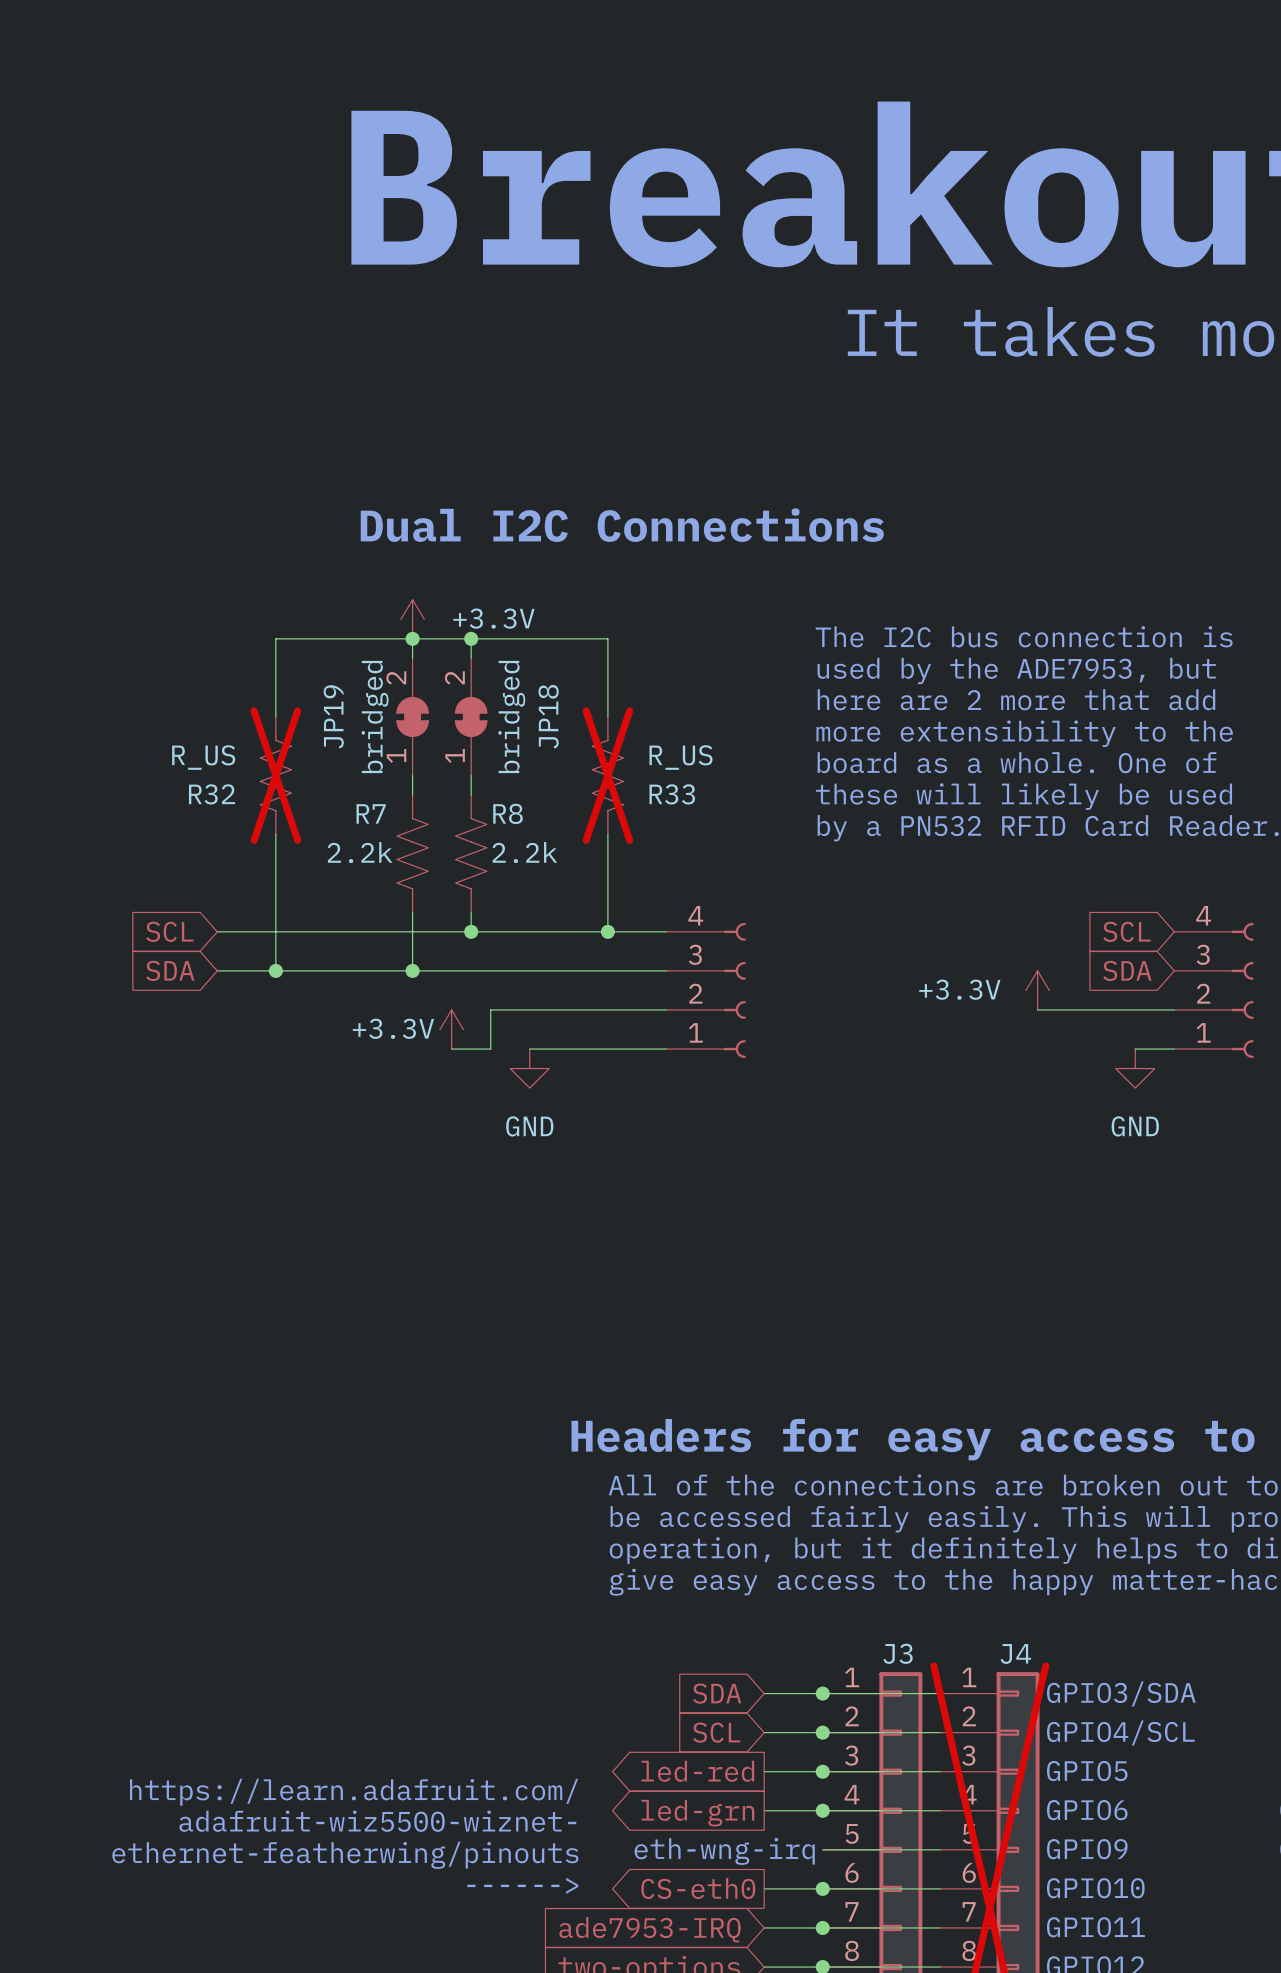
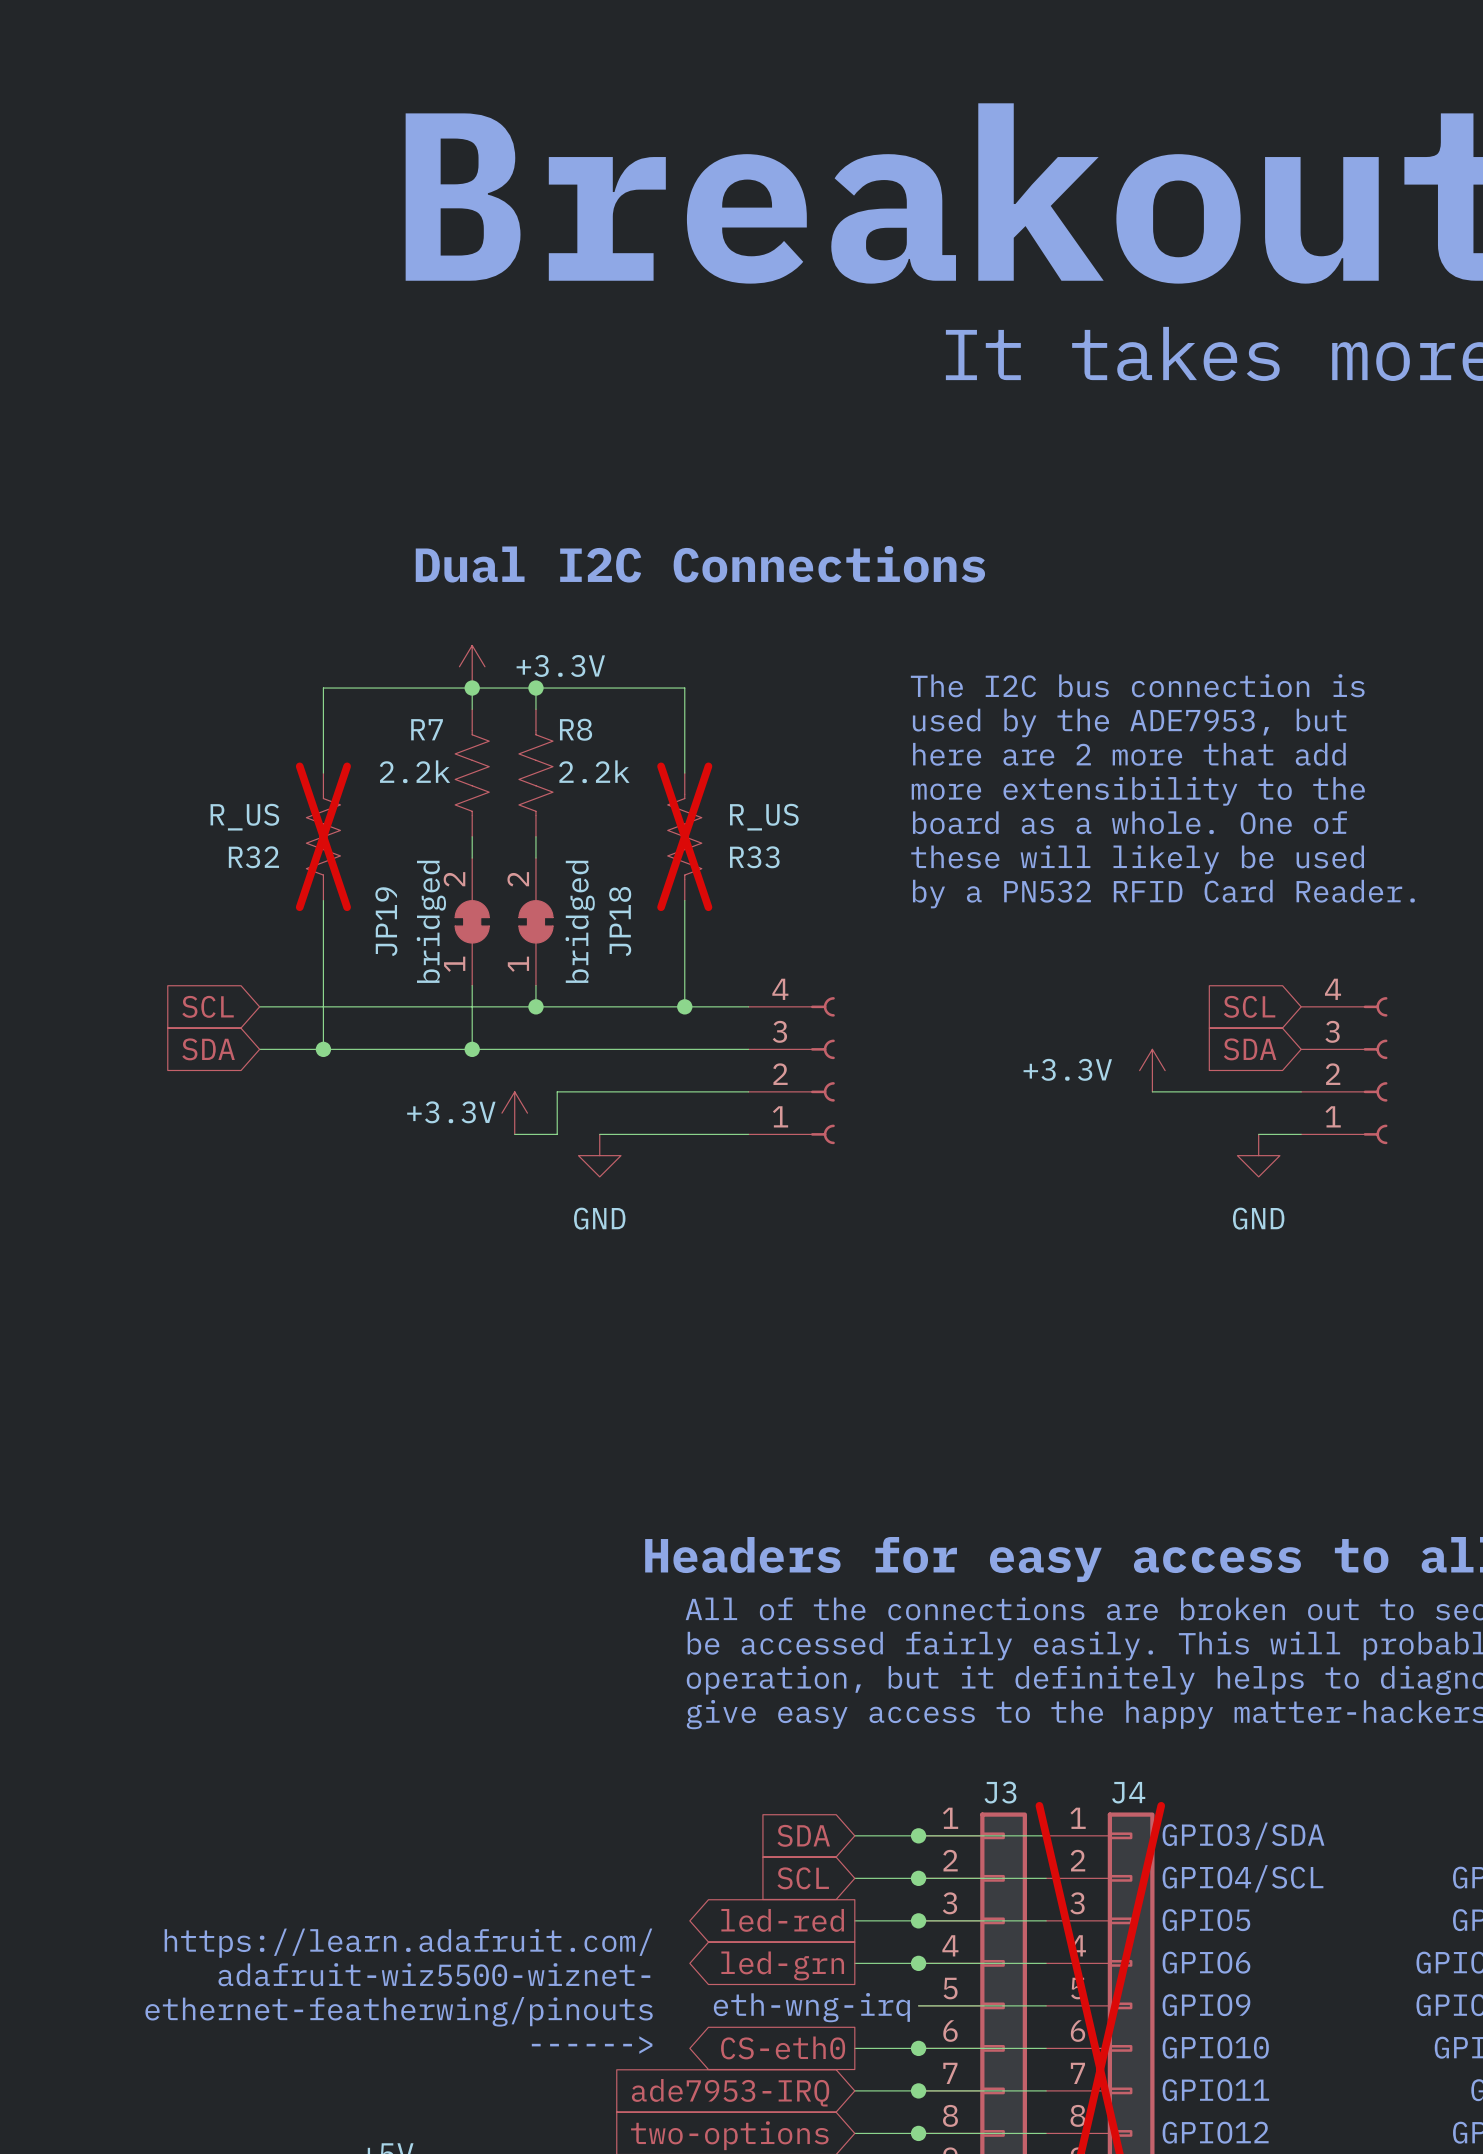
JP19 position: (412, 716) -> (472, 921)
JP18 position: (471, 716) -> (535, 921)
R7 position: (412, 853) -> (472, 773)
R8 position: (471, 853) -> (535, 773)

